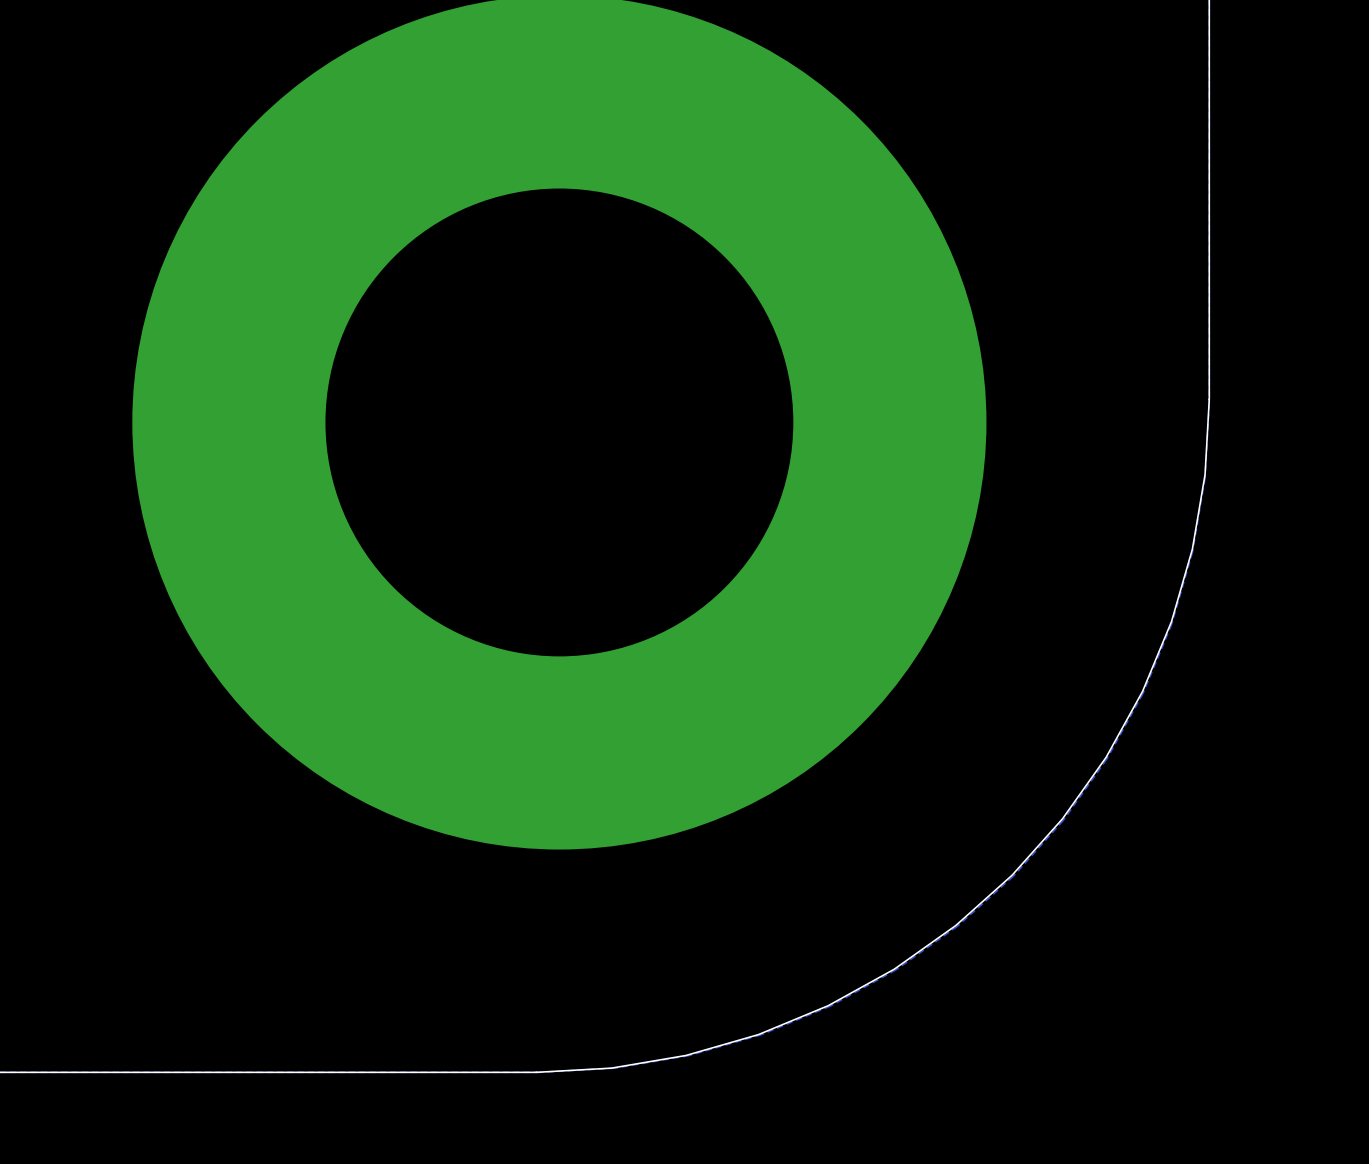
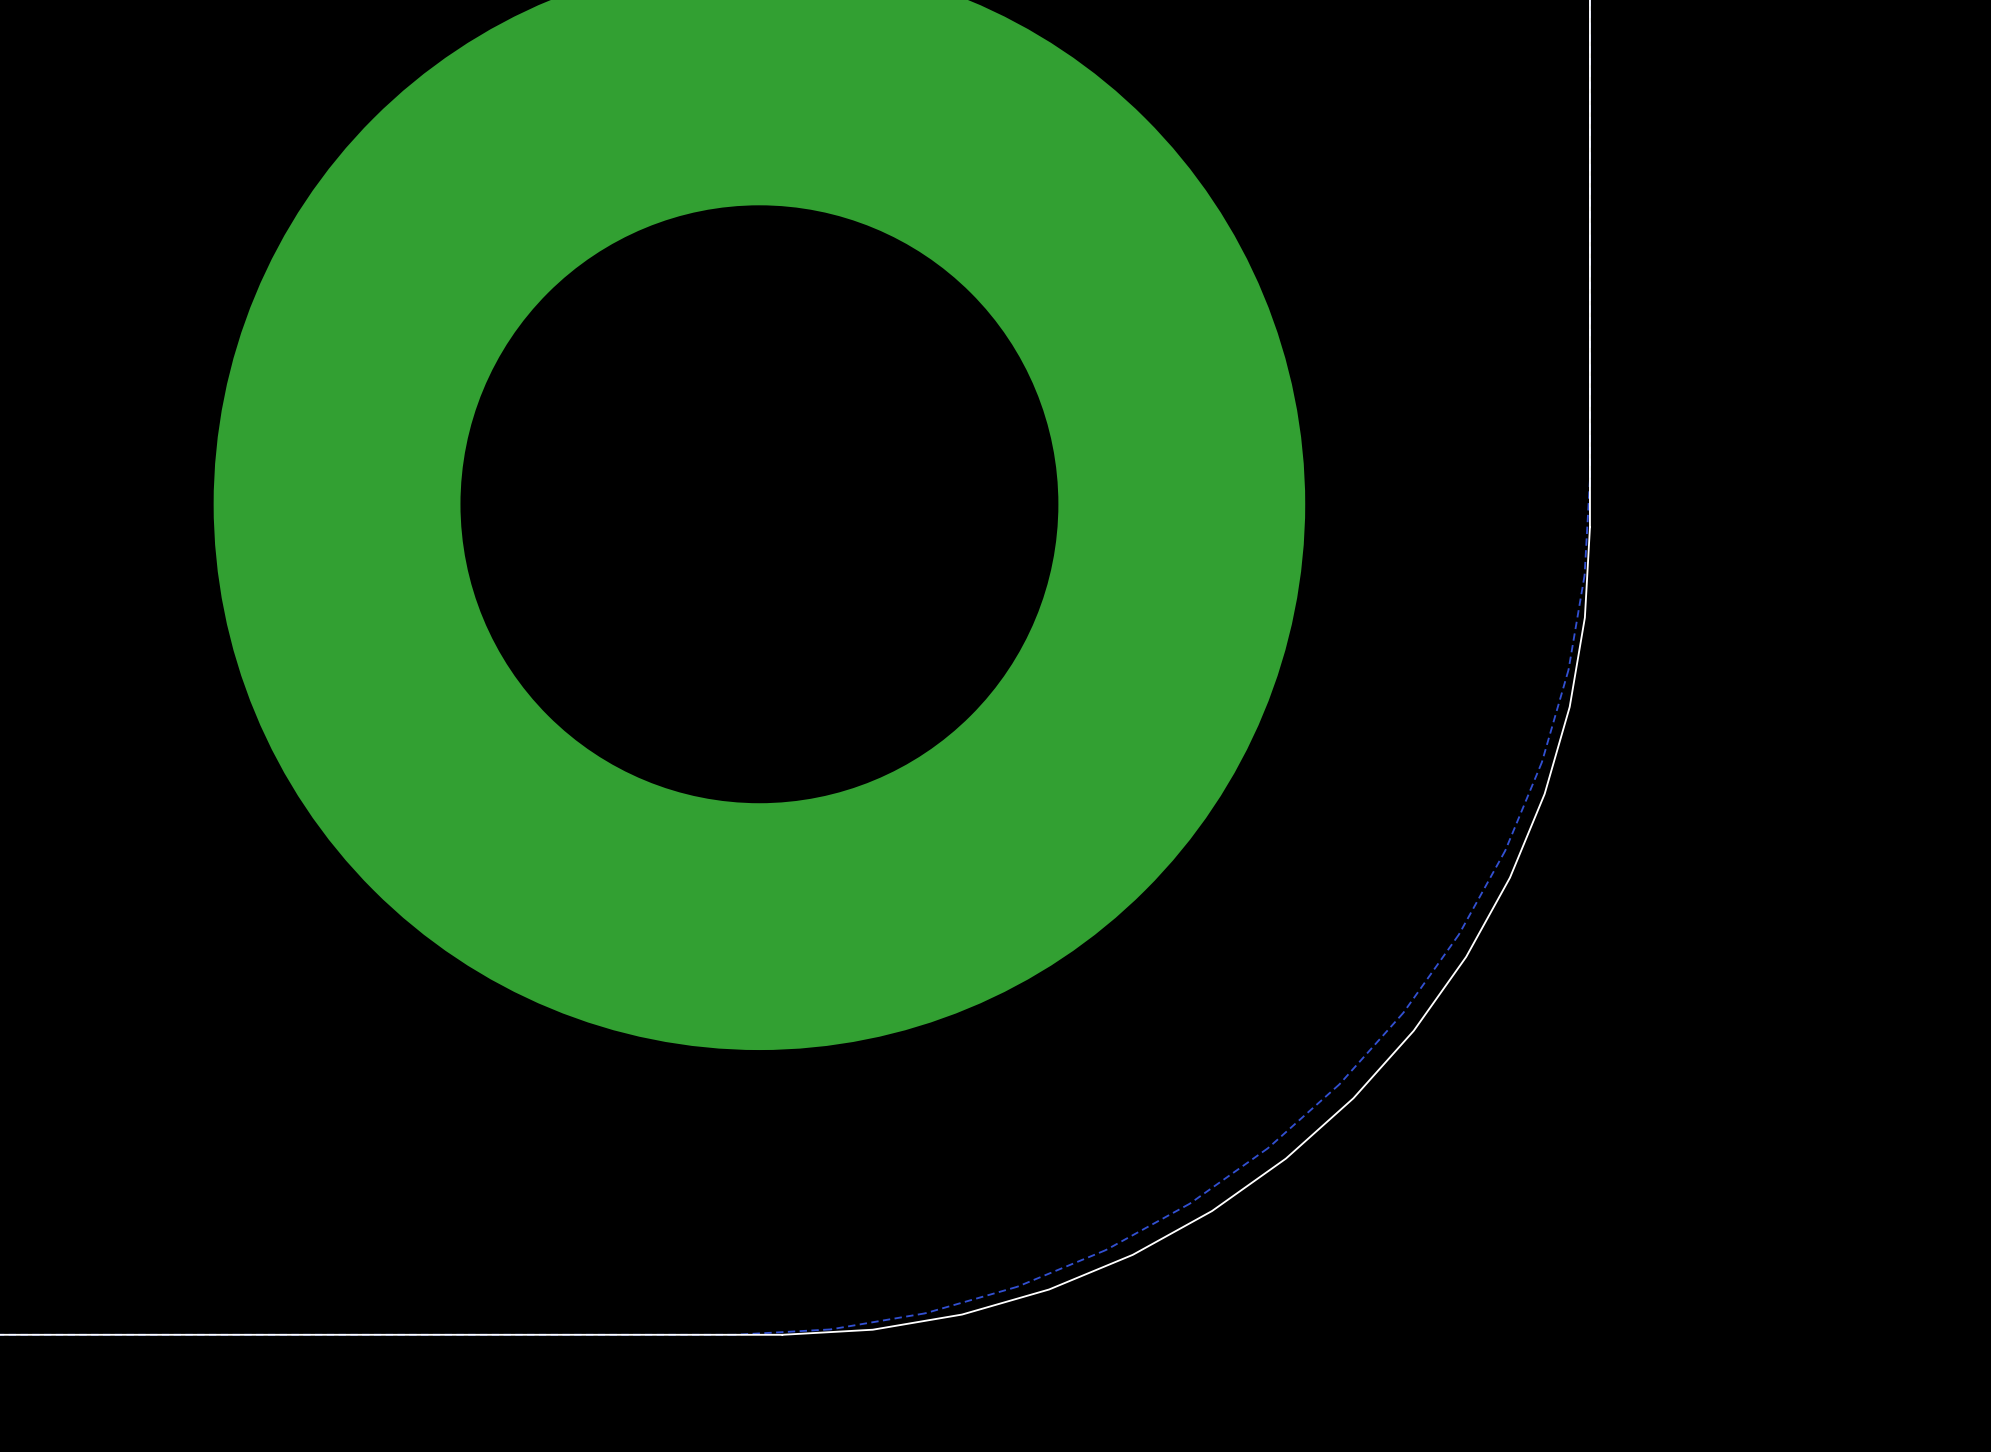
board edge: (1209, 399) (1205, 474) (1192, 549) (1171, 621) (1142, 691) (1106, 757) (1062, 818) (1012, 875) (955, 925) (894, 969) (828, 1005) (758, 1034) (685, 1055) (611, 1068) (536, 1072) -> (1589, 474) (1589, 527) (1584, 617) (1569, 706) (1544, 793) (1509, 877) (1466, 956) (1413, 1030) (1353, 1098) (1285, 1158) (1212, 1211) (1132, 1254) (1049, 1289) (962, 1314) (872, 1329) (782, 1334) (729, 1334)

